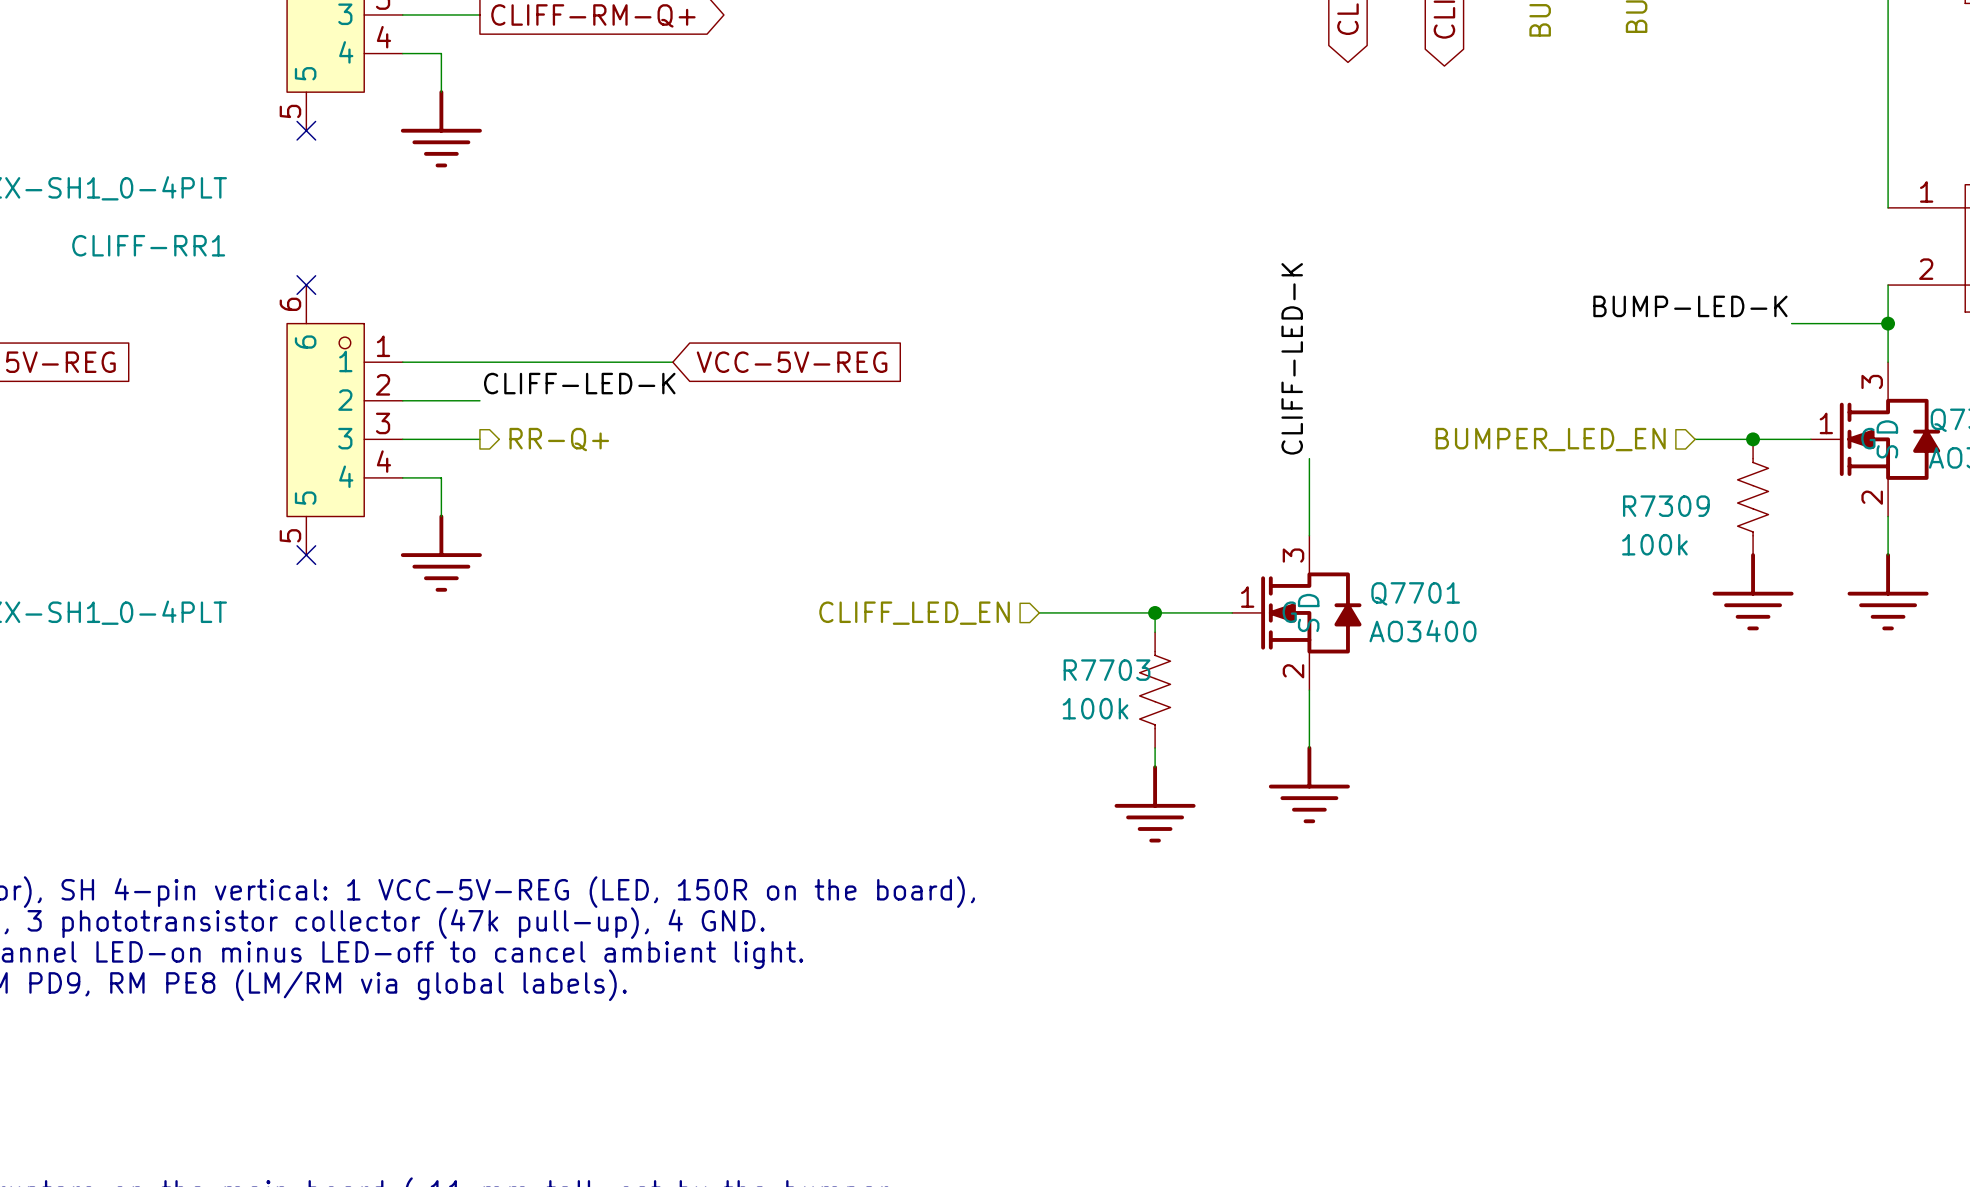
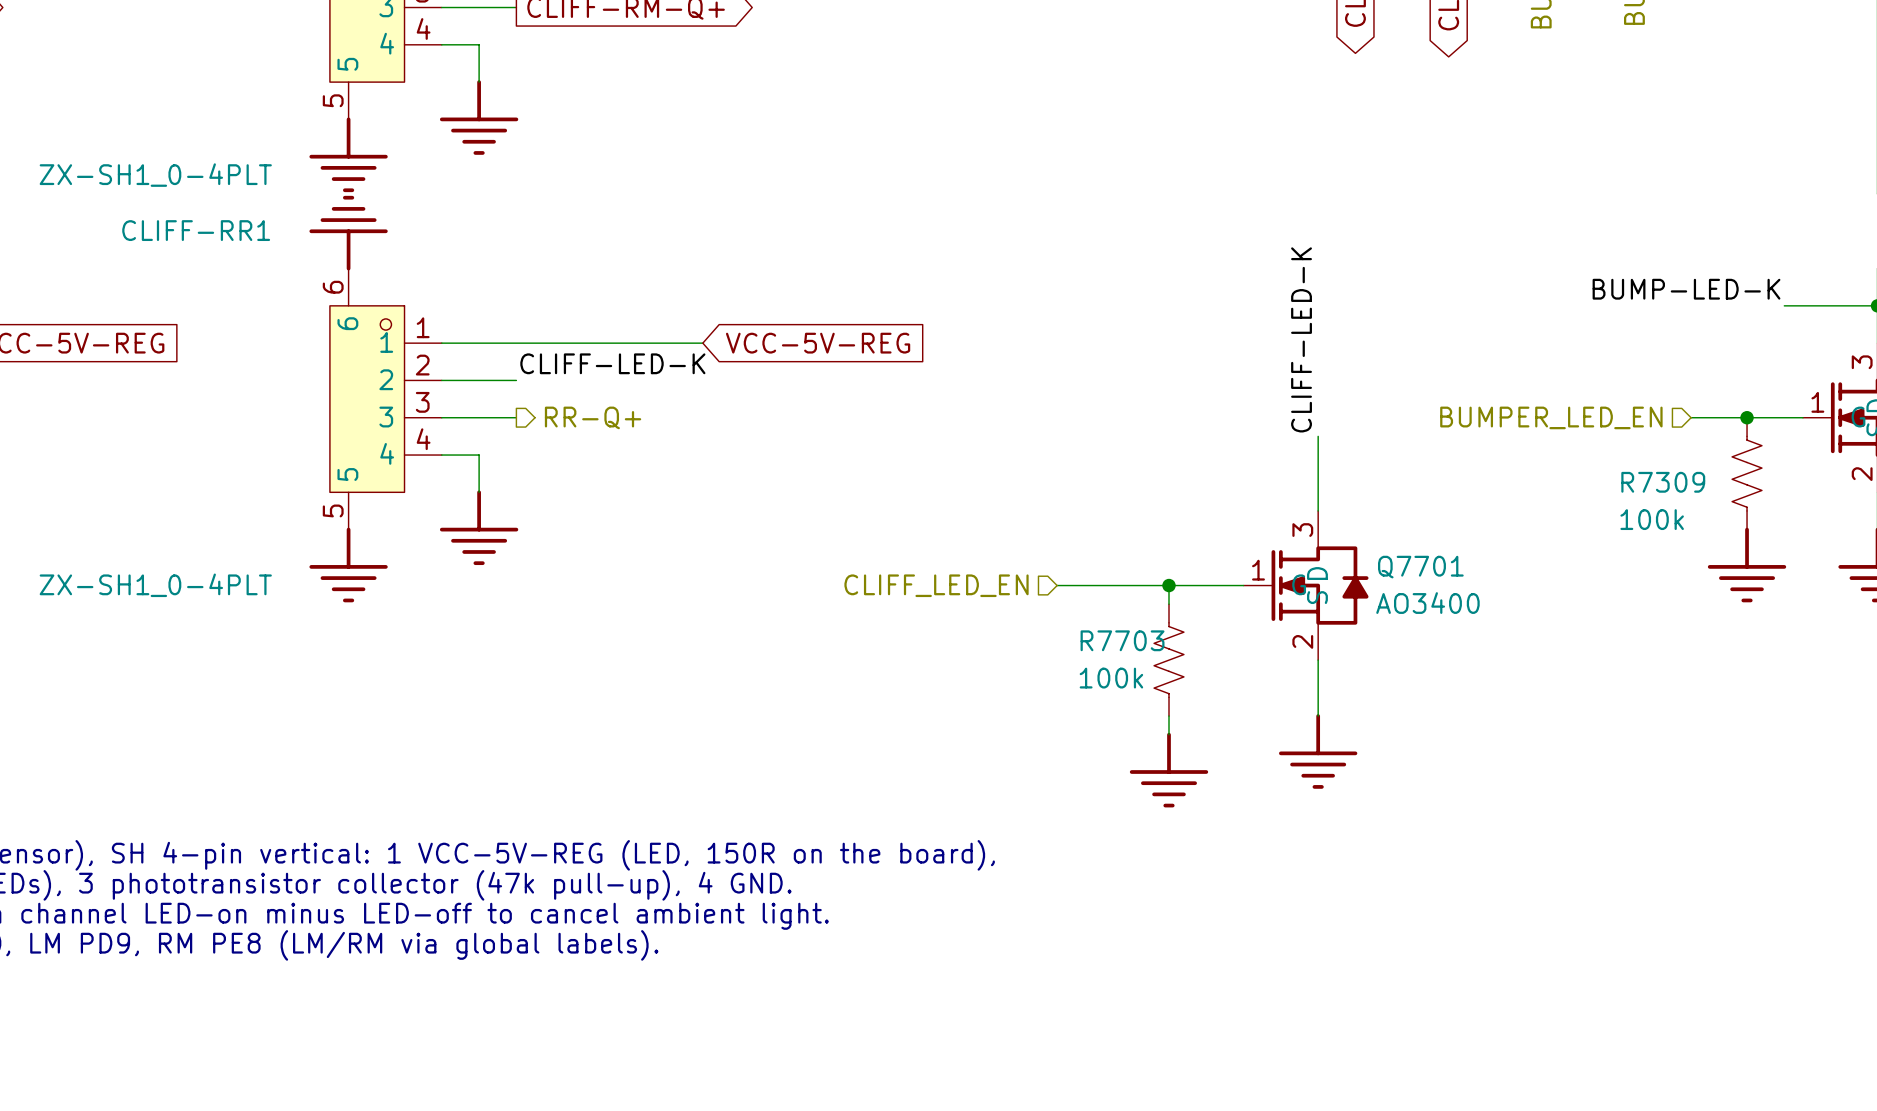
no-connect mark: (306, 130) -> none
power symbol: none -> (348, 154)
power symbol: none -> (348, 233)
no-connect mark: (306, 285) -> none
no-connect mark: (306, 555) -> none
power symbol: none -> (348, 565)

